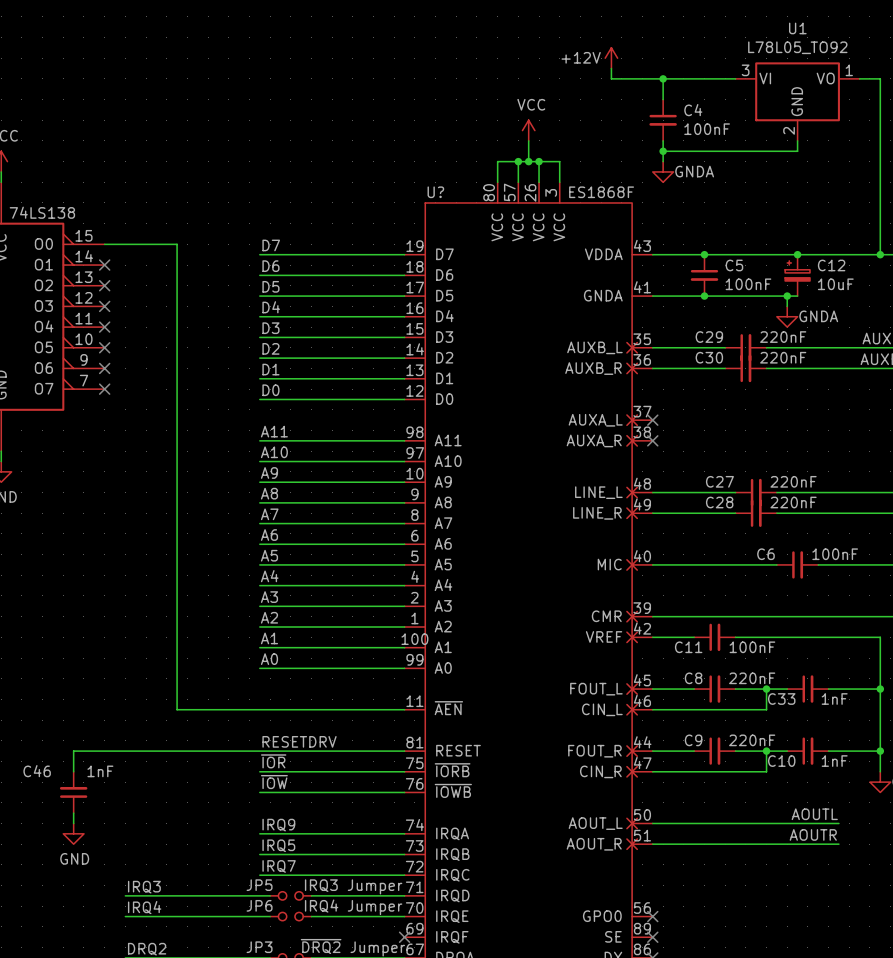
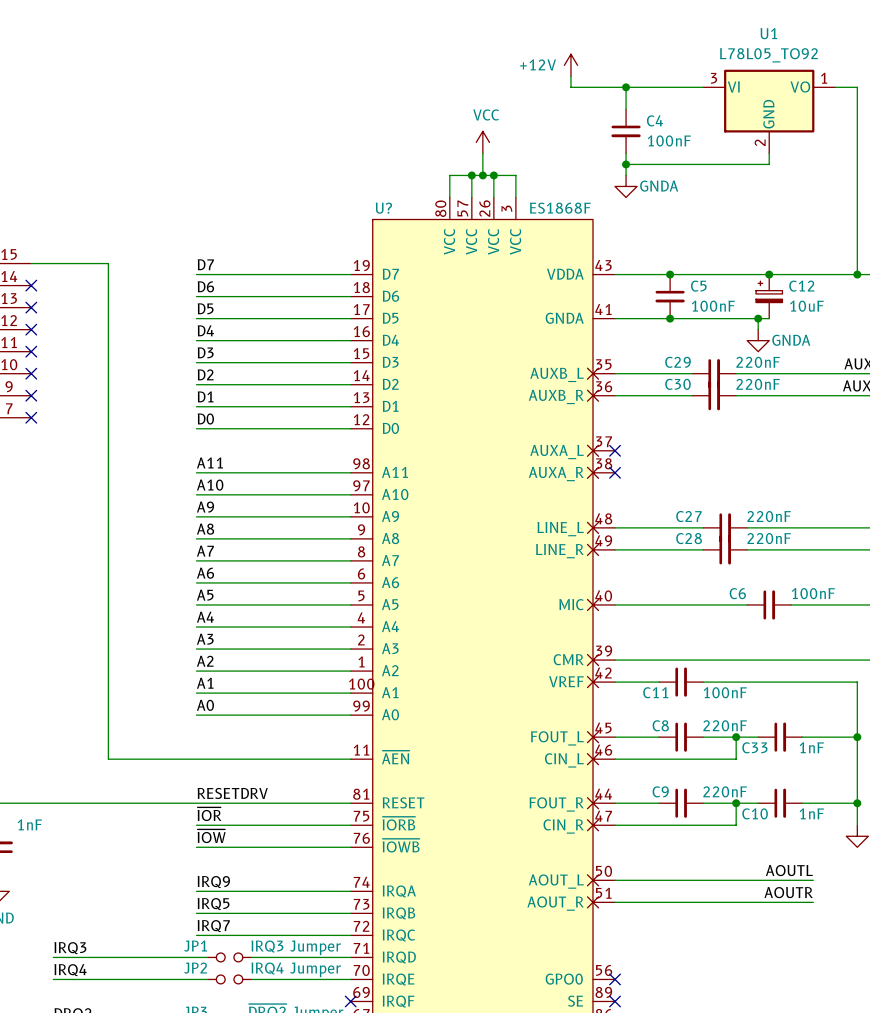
JP5 name: JP5 (259, 885) -> JP1 (195, 946)
JP6 name: JP6 (259, 905) -> JP2 (195, 968)

